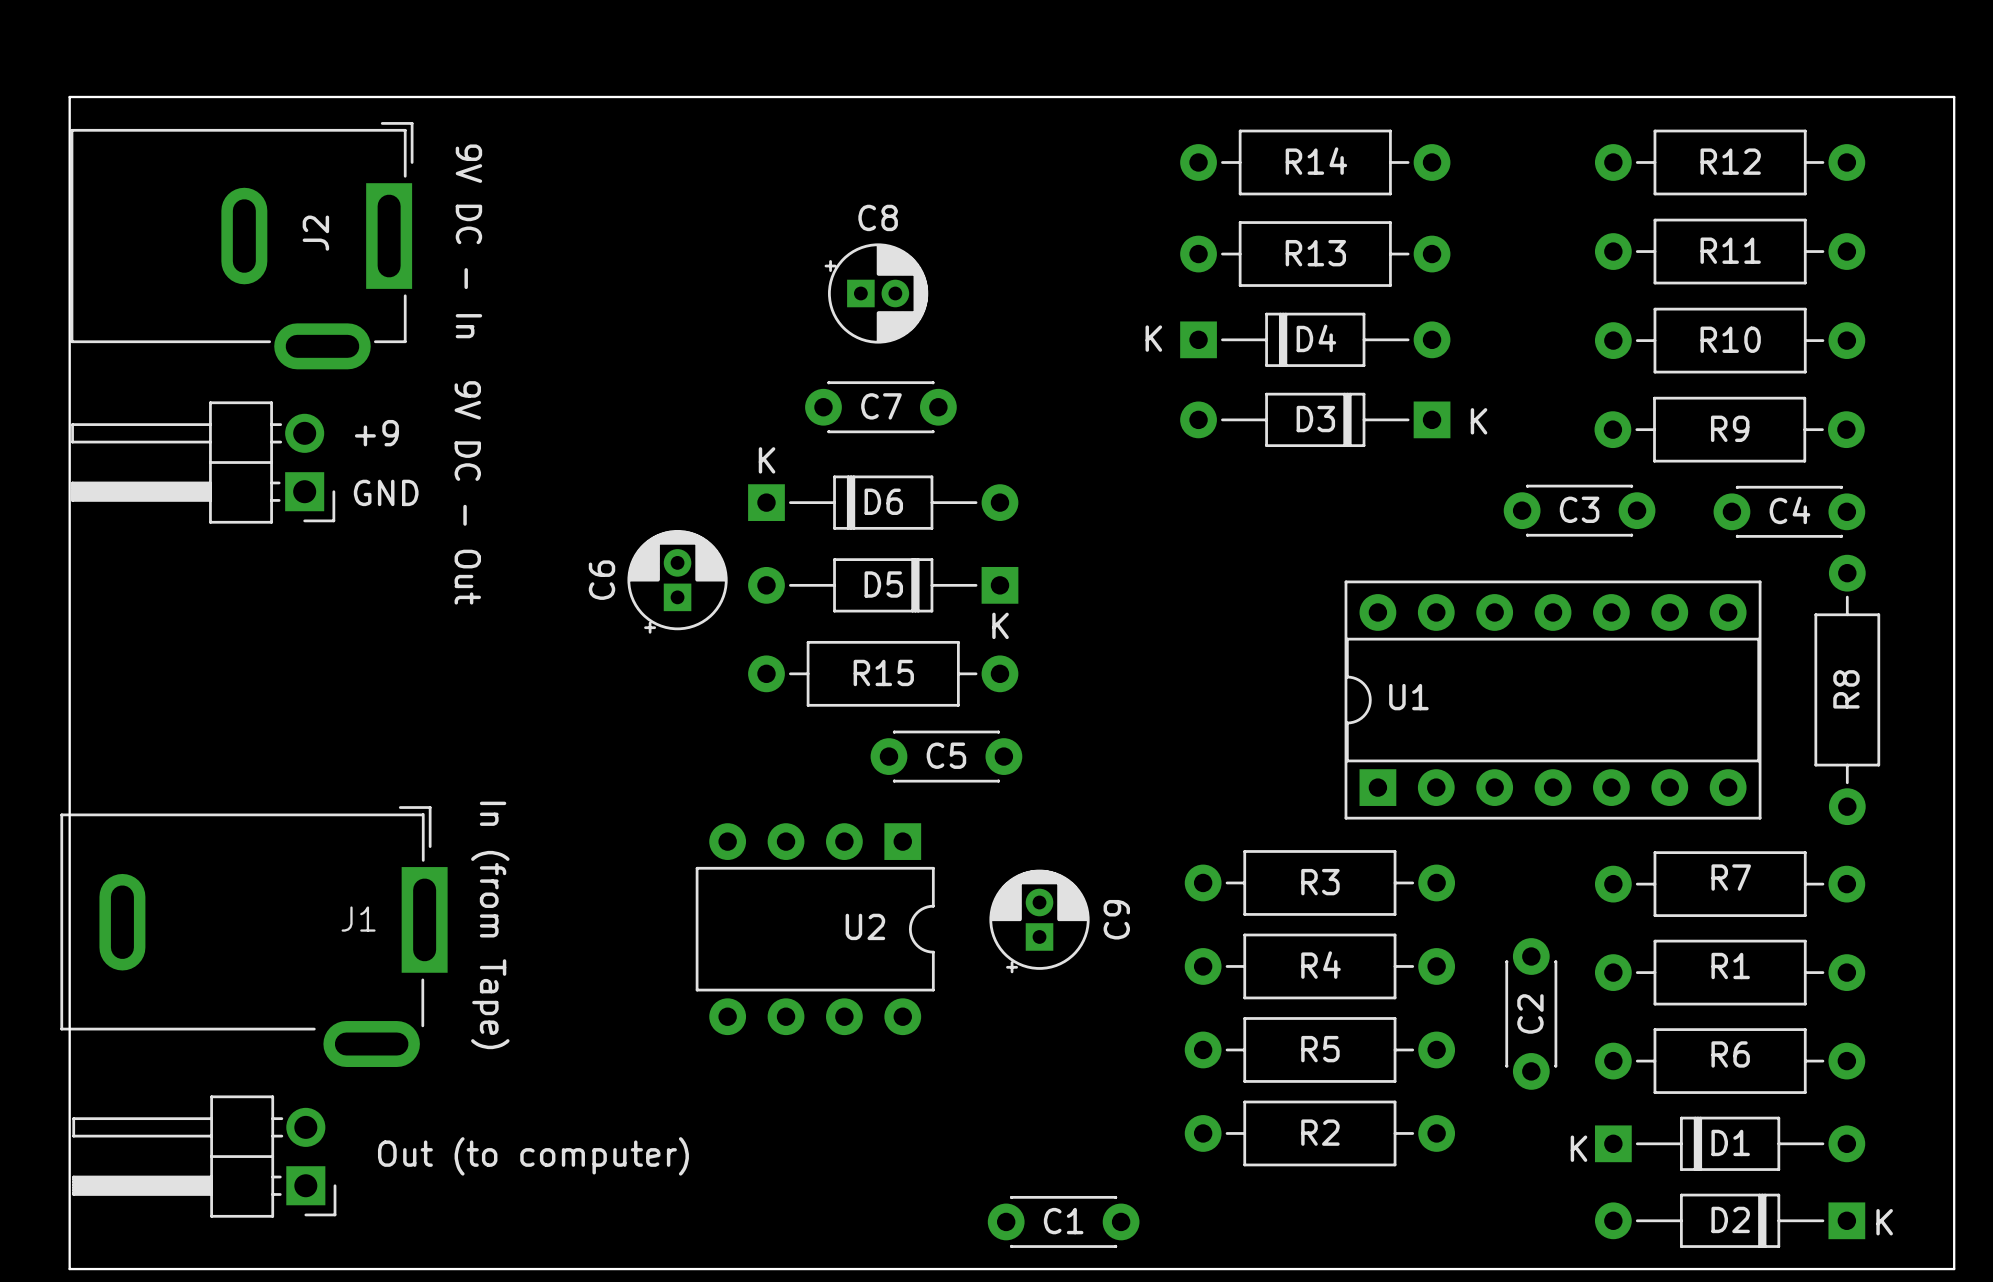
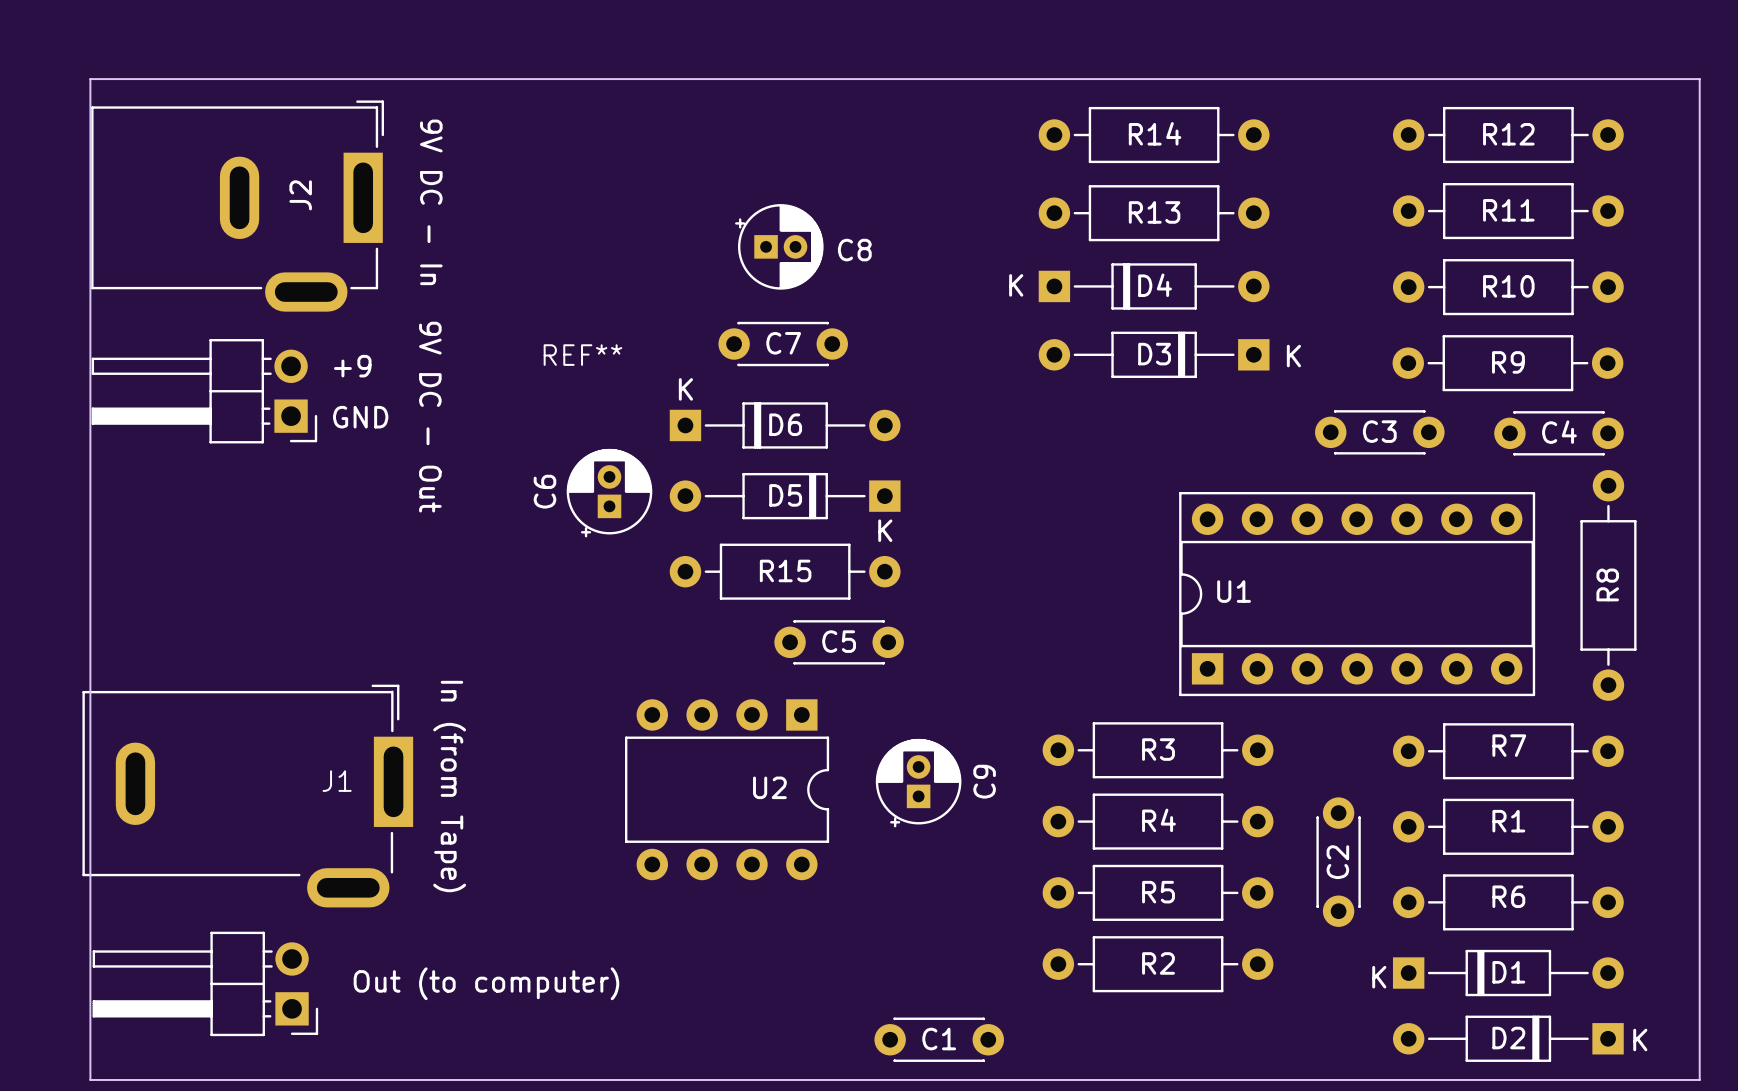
C8 name position: C8 (878, 217) -> C8 (854, 250)
REF**: none -> (582, 355)

